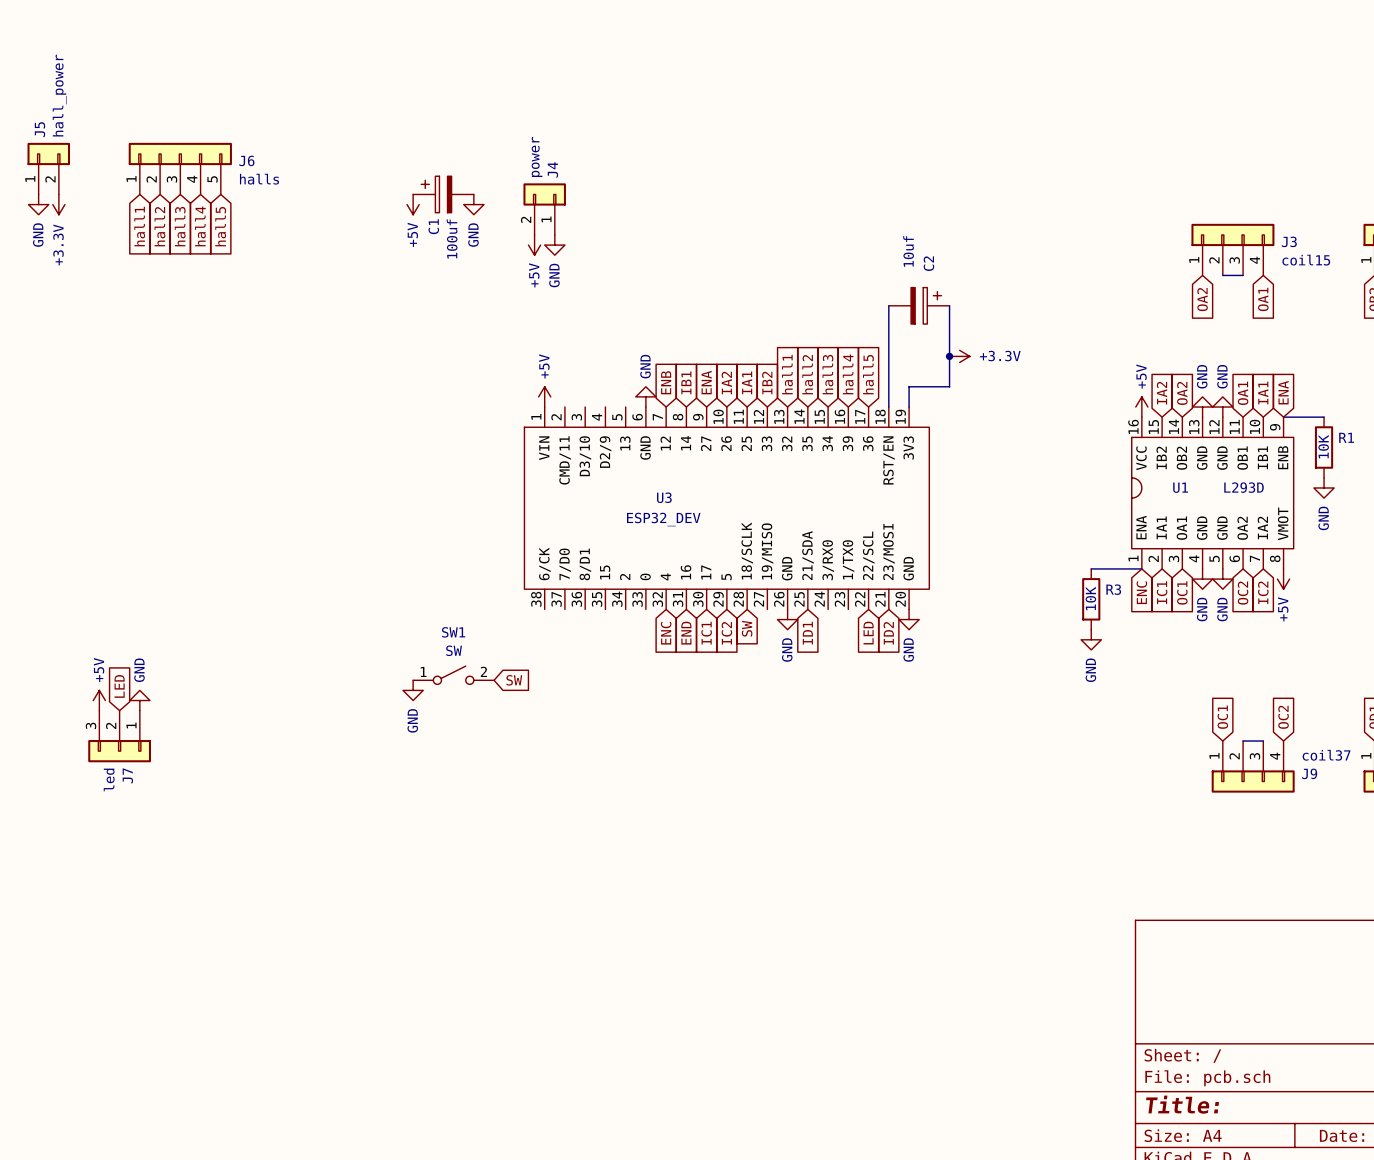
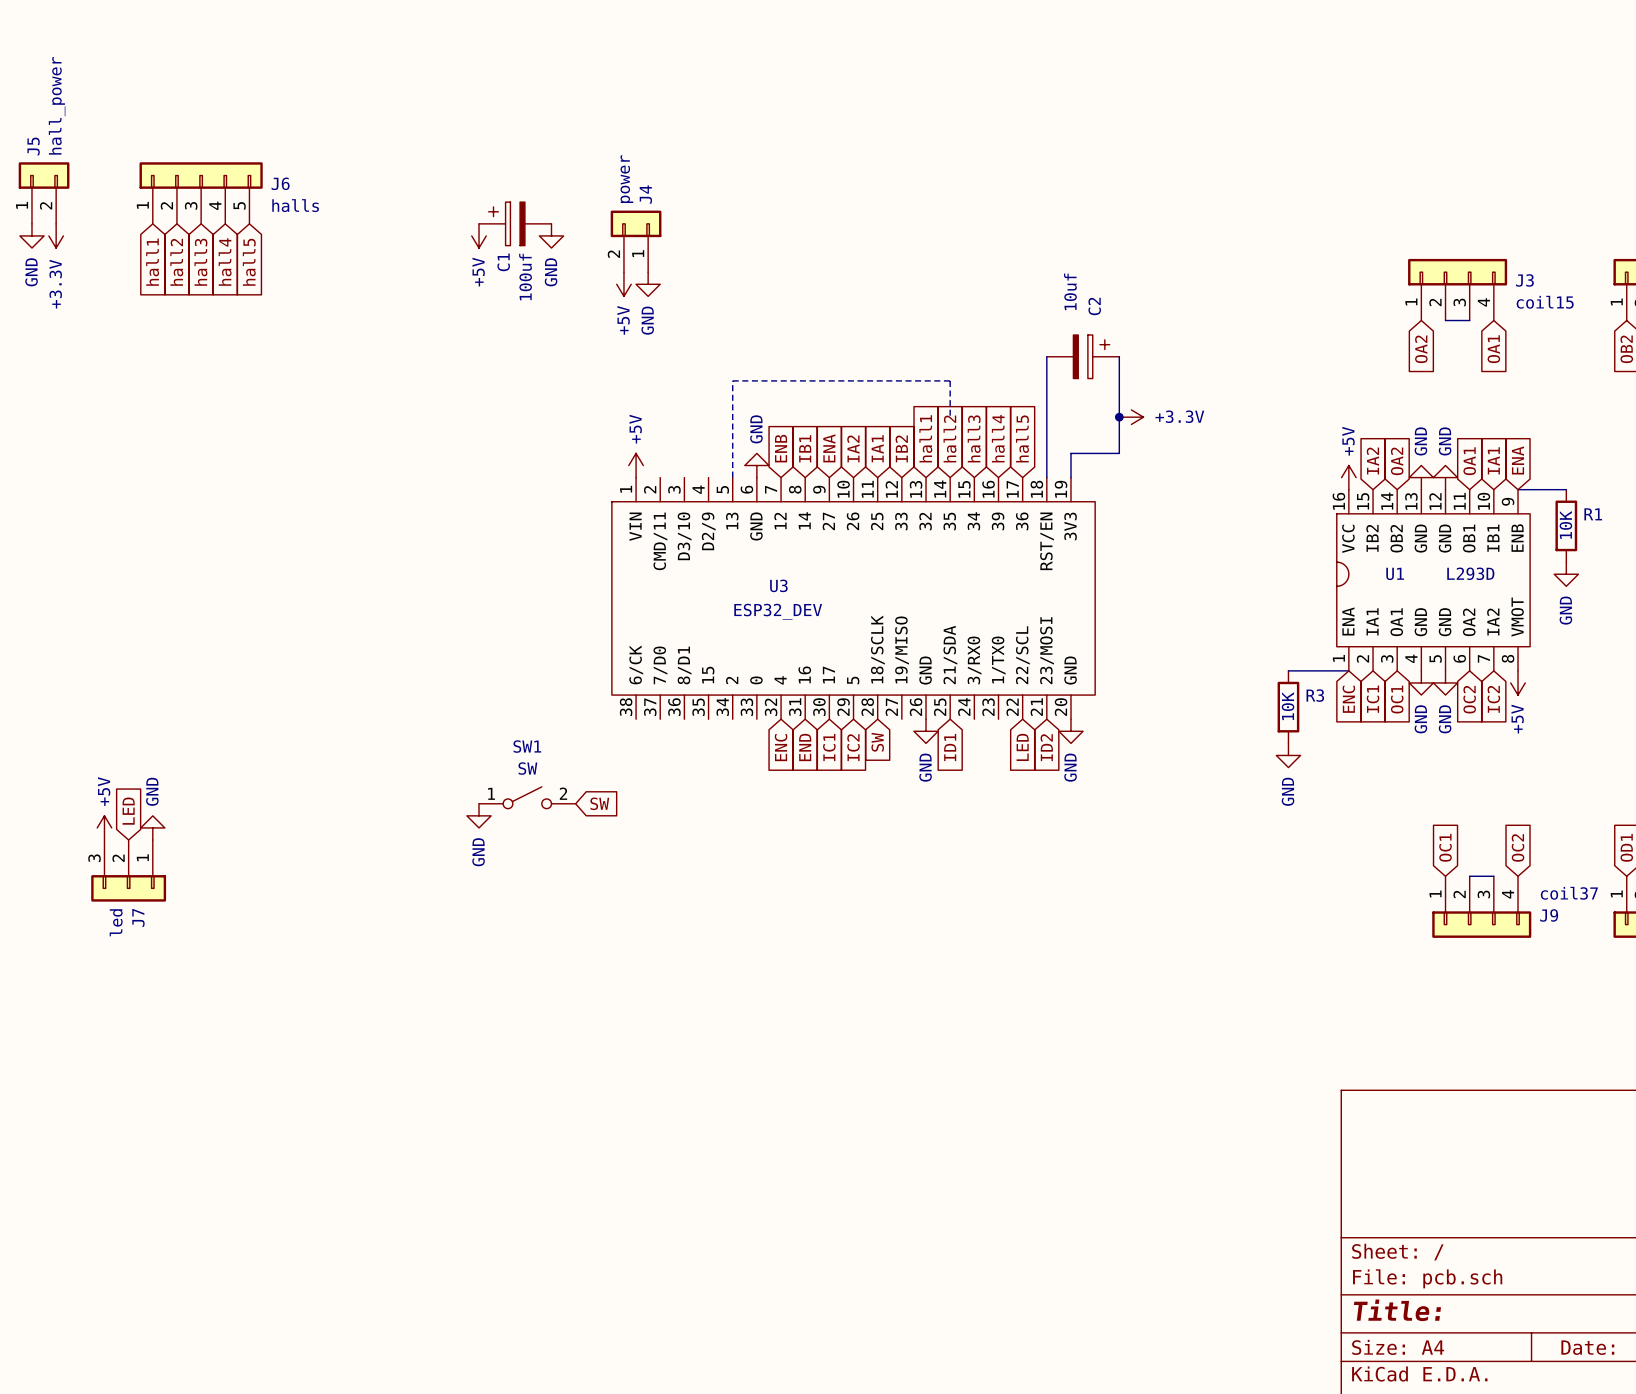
line: none -> (950, 417) (950, 380) (732, 380) (732, 477)

